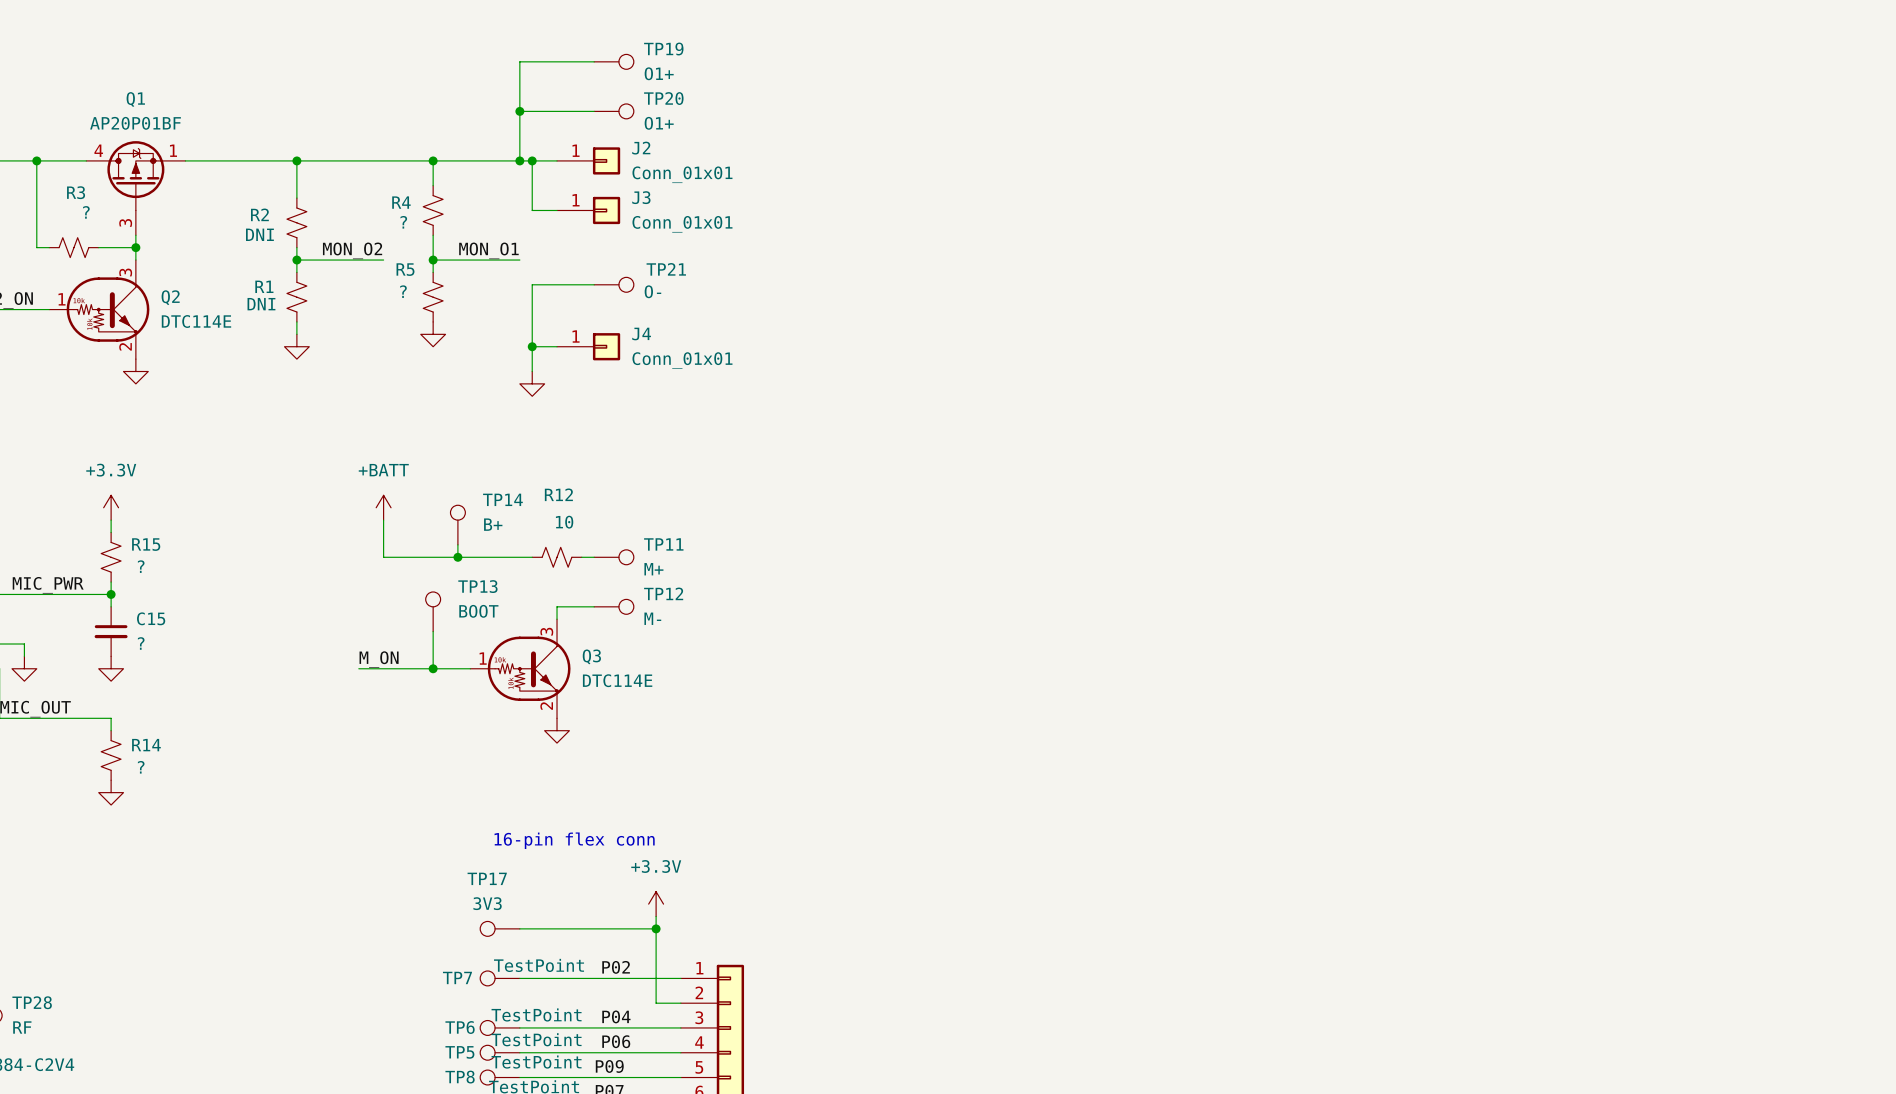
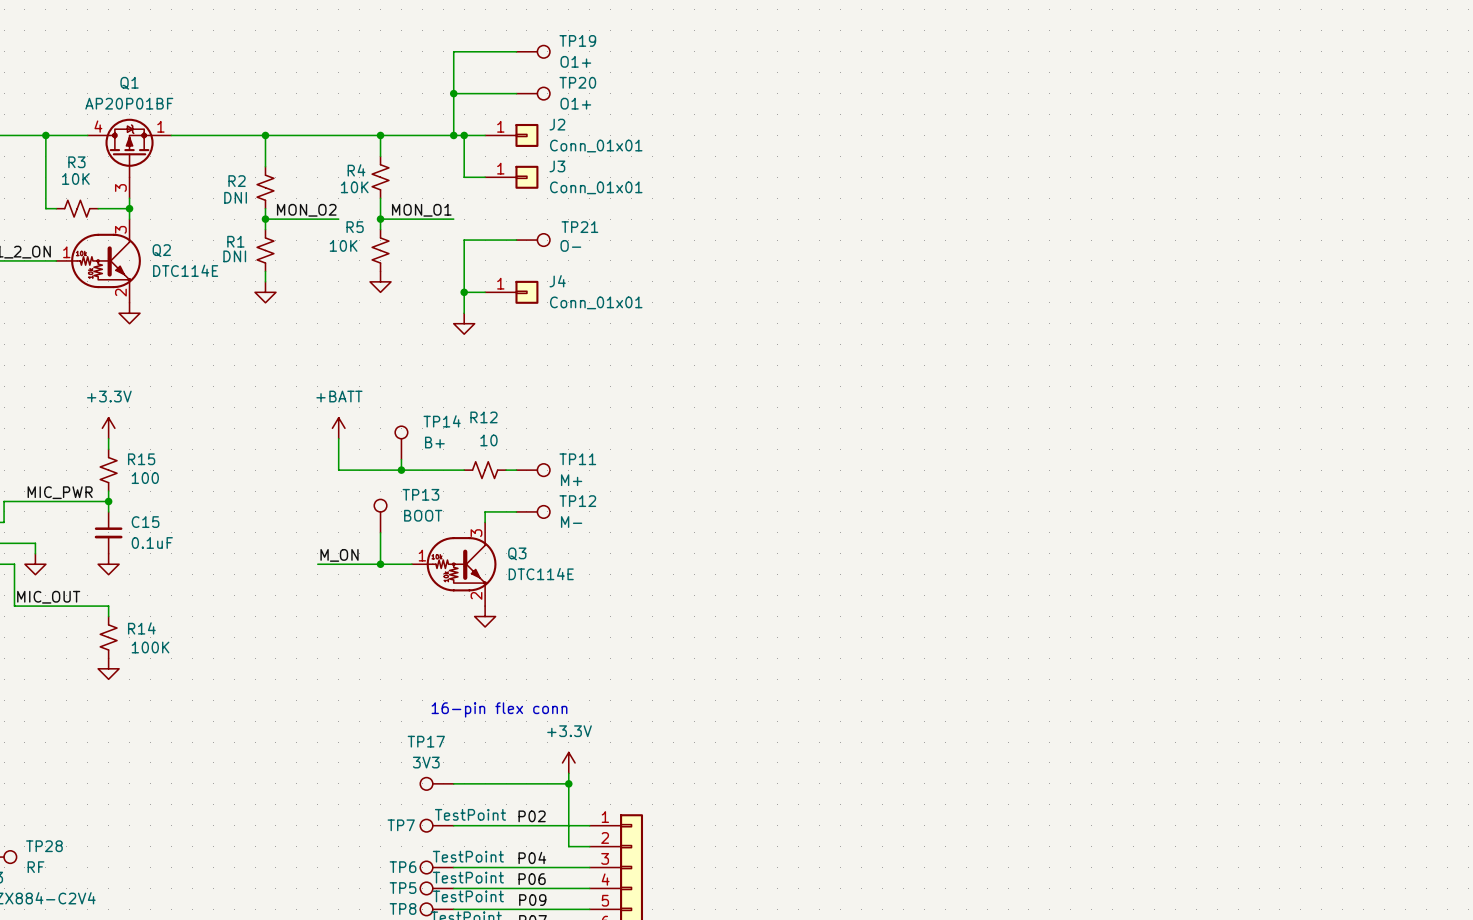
R3 value: ? (86, 212) -> 10K (75, 178)
R4 value: ? (403, 222) -> 10K (354, 187)
R5 value: ? (403, 291) -> 10K (343, 245)
R15 value: ? (141, 566) -> 100 (145, 478)
C15 value: ? (141, 643) -> 0.1uF (152, 542)
R14 value: ? (141, 767) -> 100K (150, 647)

